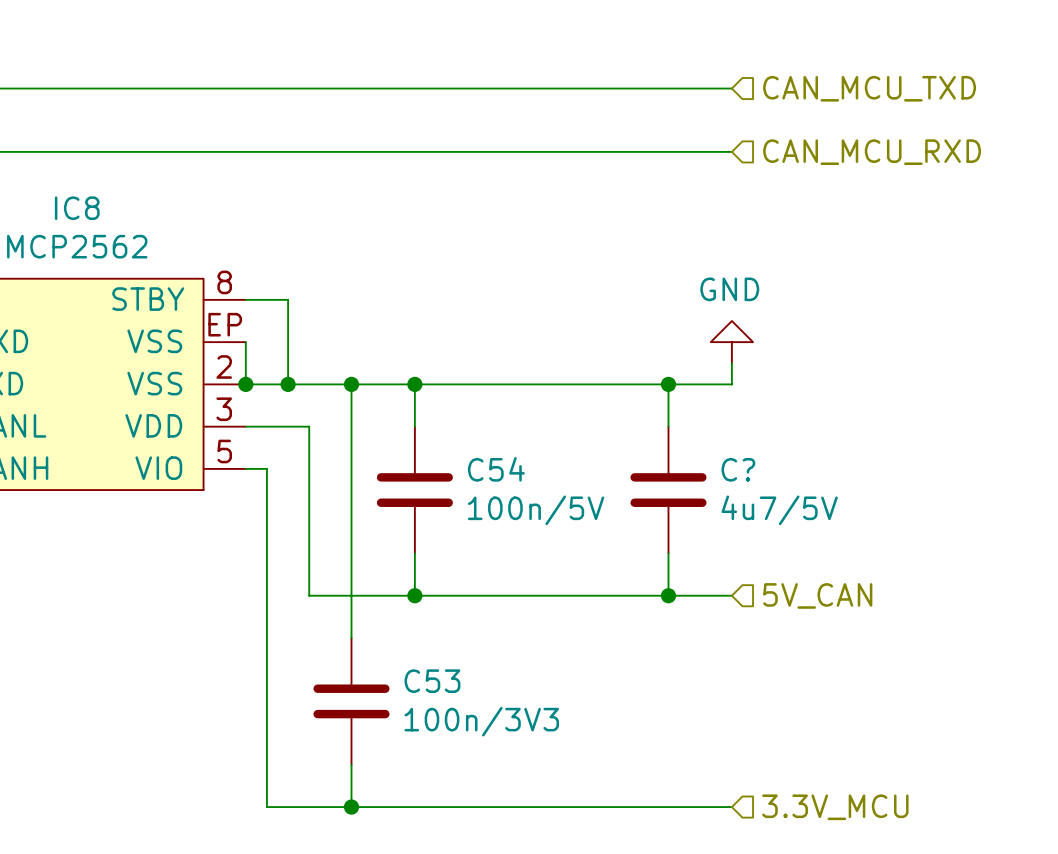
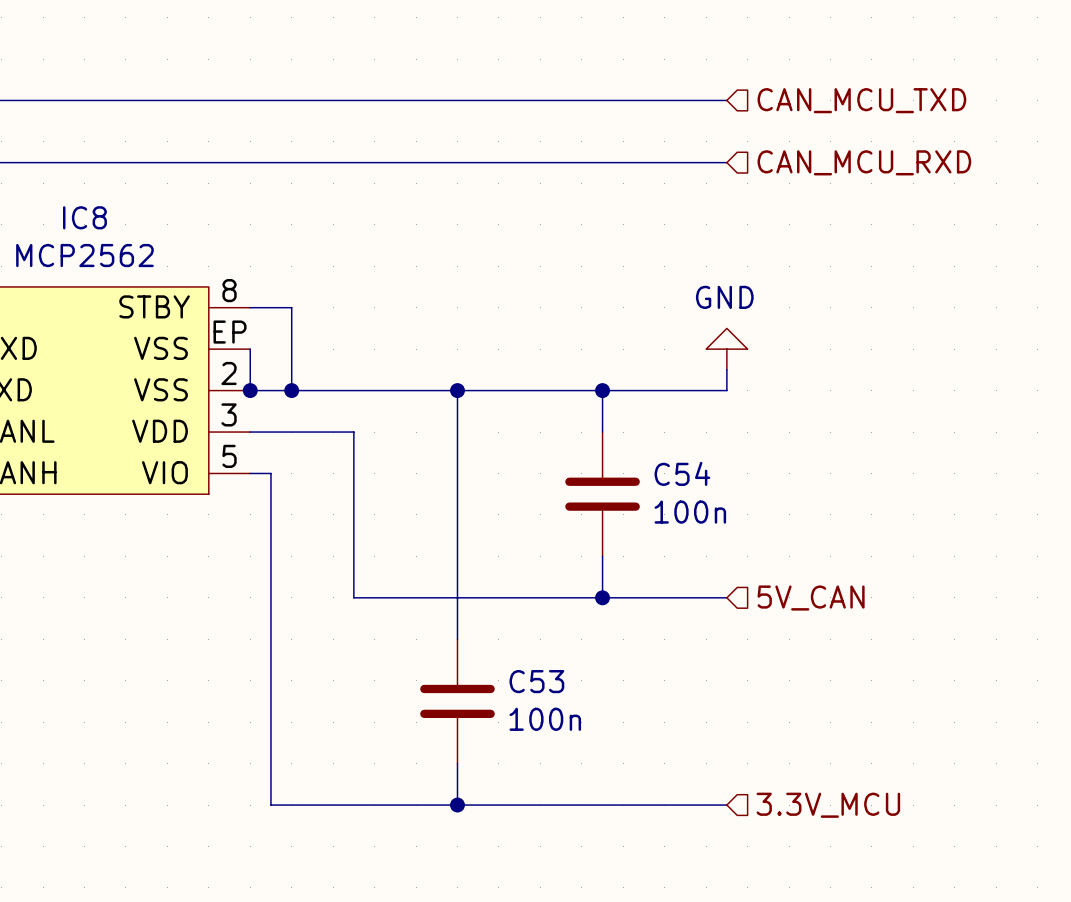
wire: (351, 384) (351, 426) -> (312, 432) (353, 432)
junction: (351, 384) -> none
wire: (414, 384) (414, 426) -> none
junction position: (414, 384) -> (457, 390)
wire: none -> (457, 390) (457, 639)
wire: (668, 384) (668, 426) -> (602, 390) (602, 432)
junction position: (668, 384) -> (602, 390)
wire: (309, 426) (309, 595) (351, 595) (351, 637) -> none
C54 position: (414, 490) -> (602, 494)
C?: 4u7/5V (668, 490) -> none
C54 value: 100n/5V (536, 510) -> 100n (690, 512)
wire: (414, 553) (414, 595) -> none
wire: (668, 553) (668, 595) -> (602, 556) (602, 597)
junction: (414, 595) -> none
junction position: (668, 595) -> (602, 597)
C53 position: (351, 701) -> (457, 701)
C53 value: 100n/3V3 (481, 721) -> 100n (545, 719)
wire: (351, 764) (351, 807) -> (457, 763) (457, 805)
junction: (351, 807) -> none
junction: none -> (457, 805)

